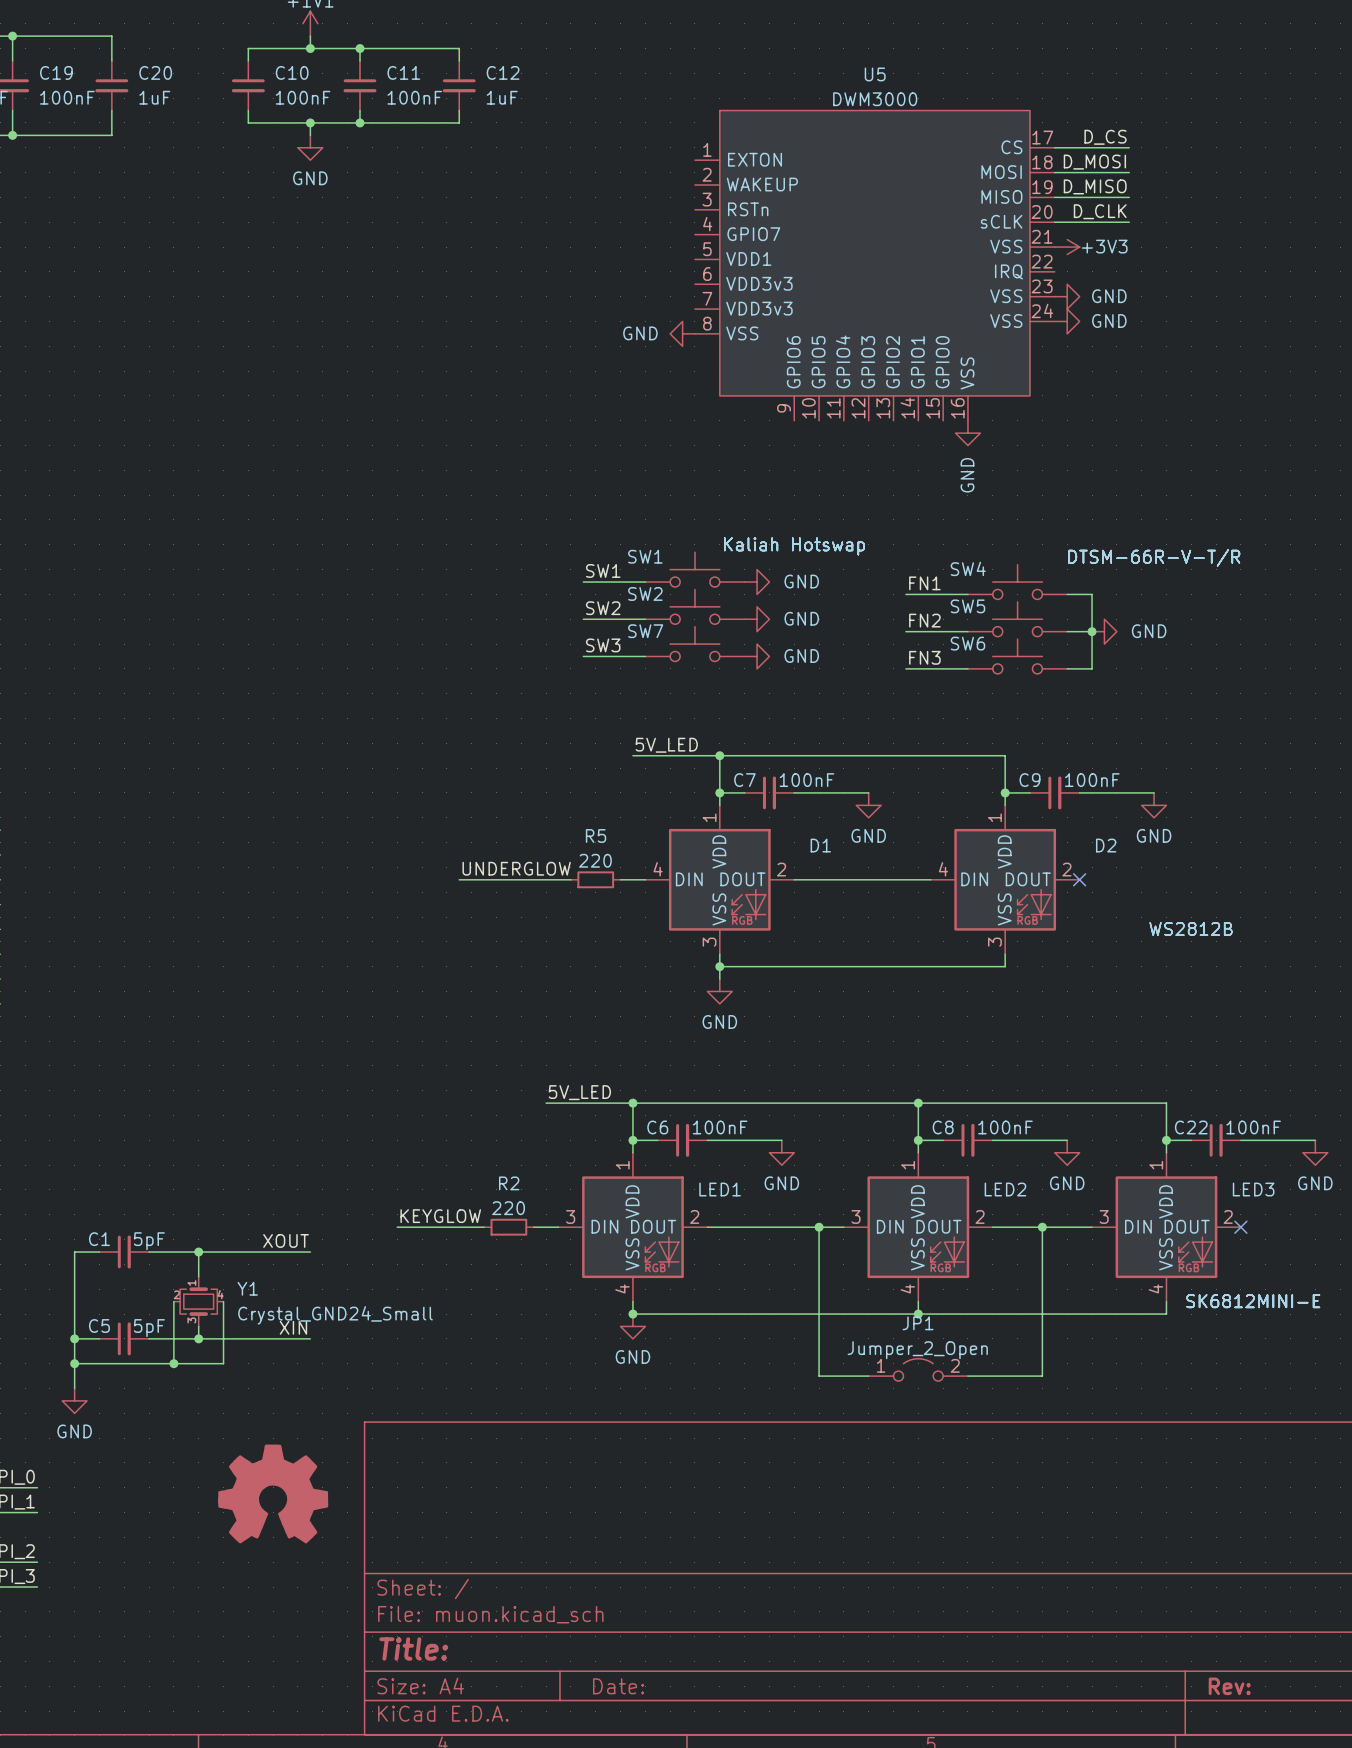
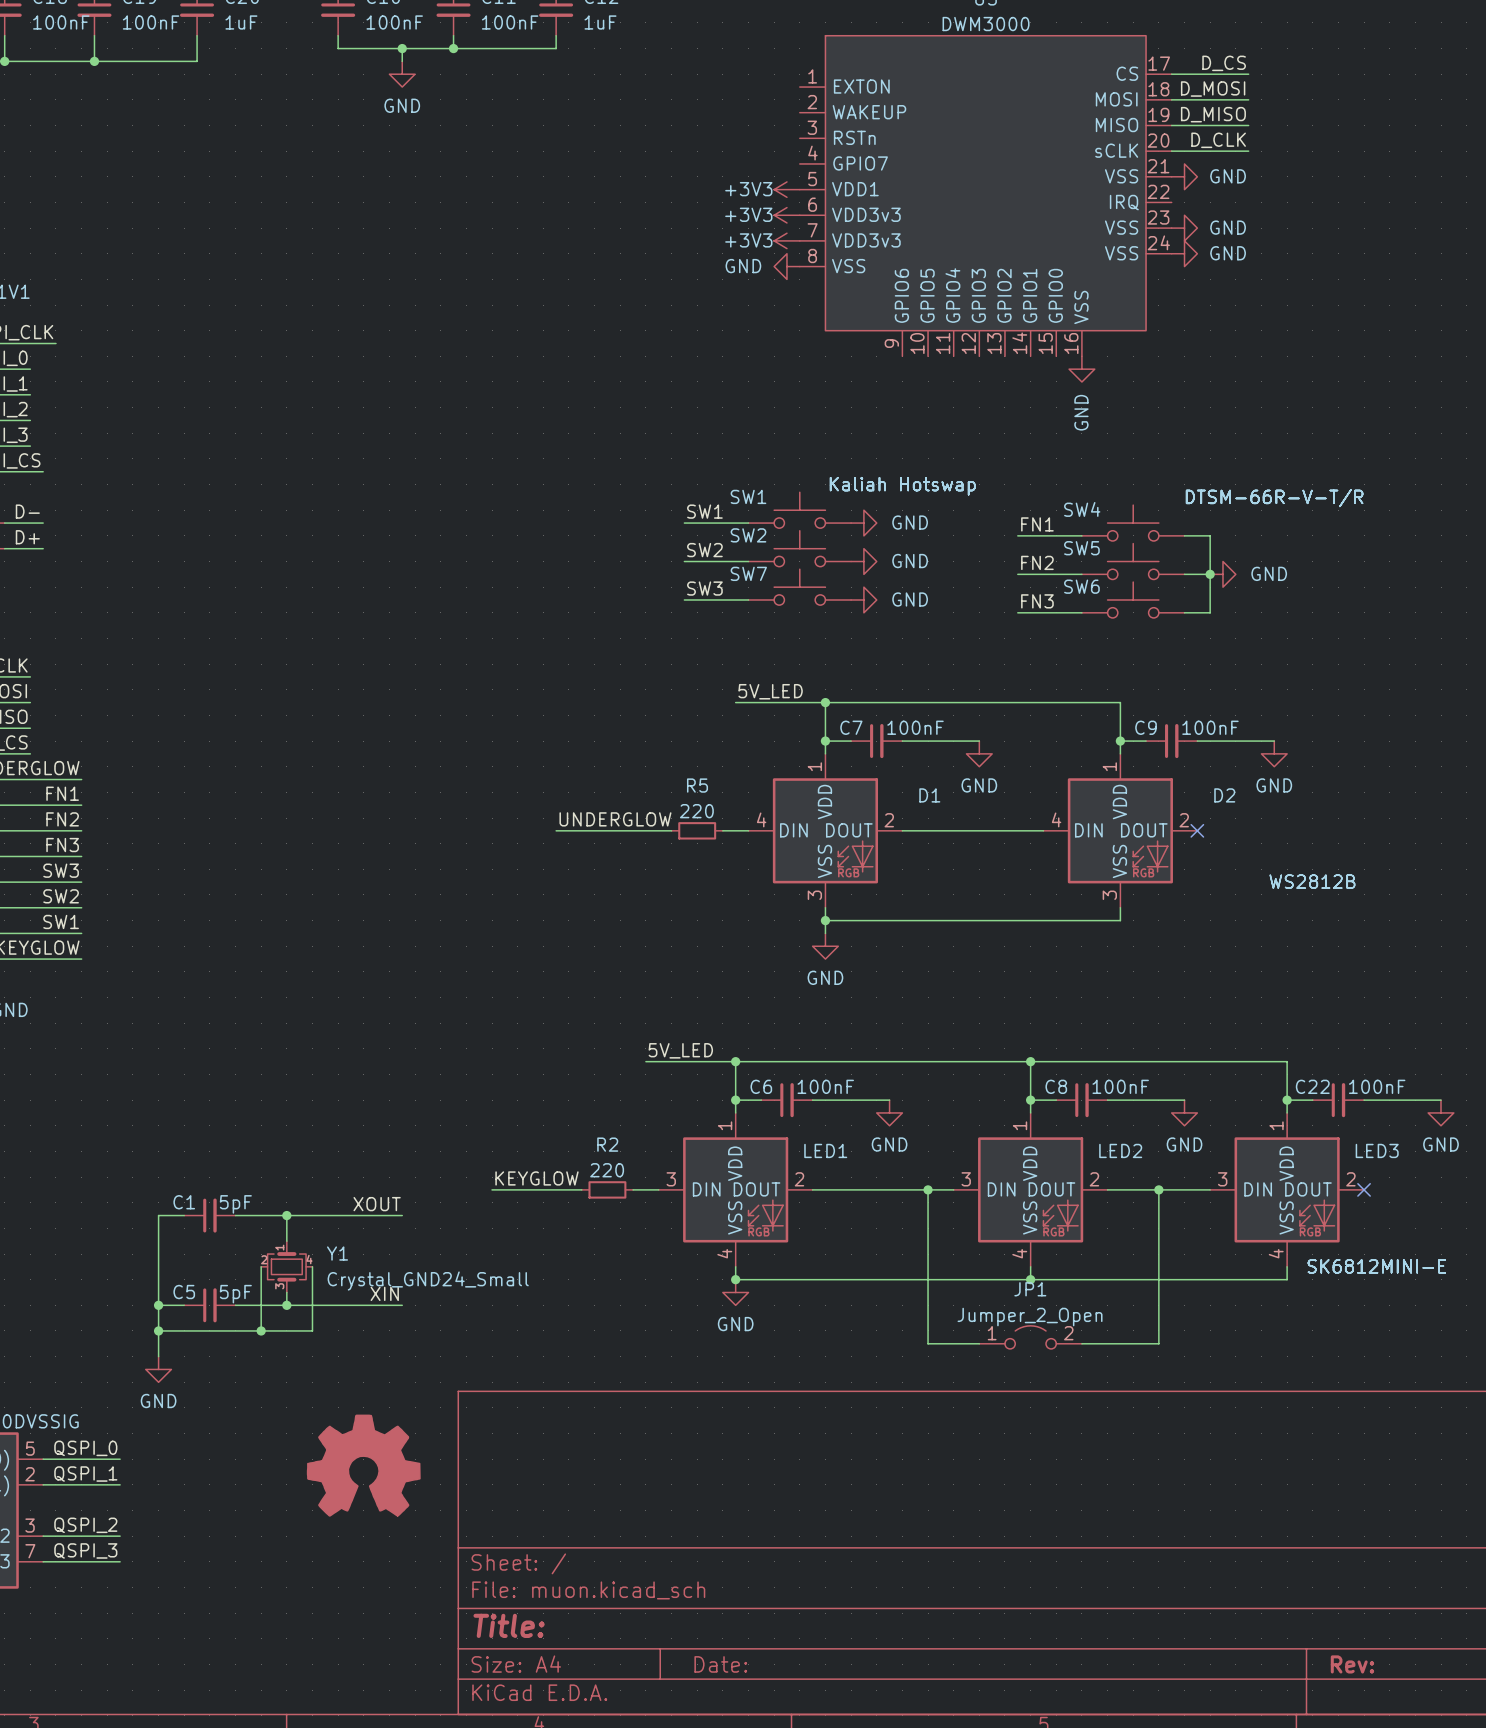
power symbol: +3V3 (1067, 247) -> GND (1184, 176)
power symbol: none -> +3V3 (786, 189)
power symbol: none -> +3V3 (786, 215)
power symbol: none -> +3V3 (786, 240)

